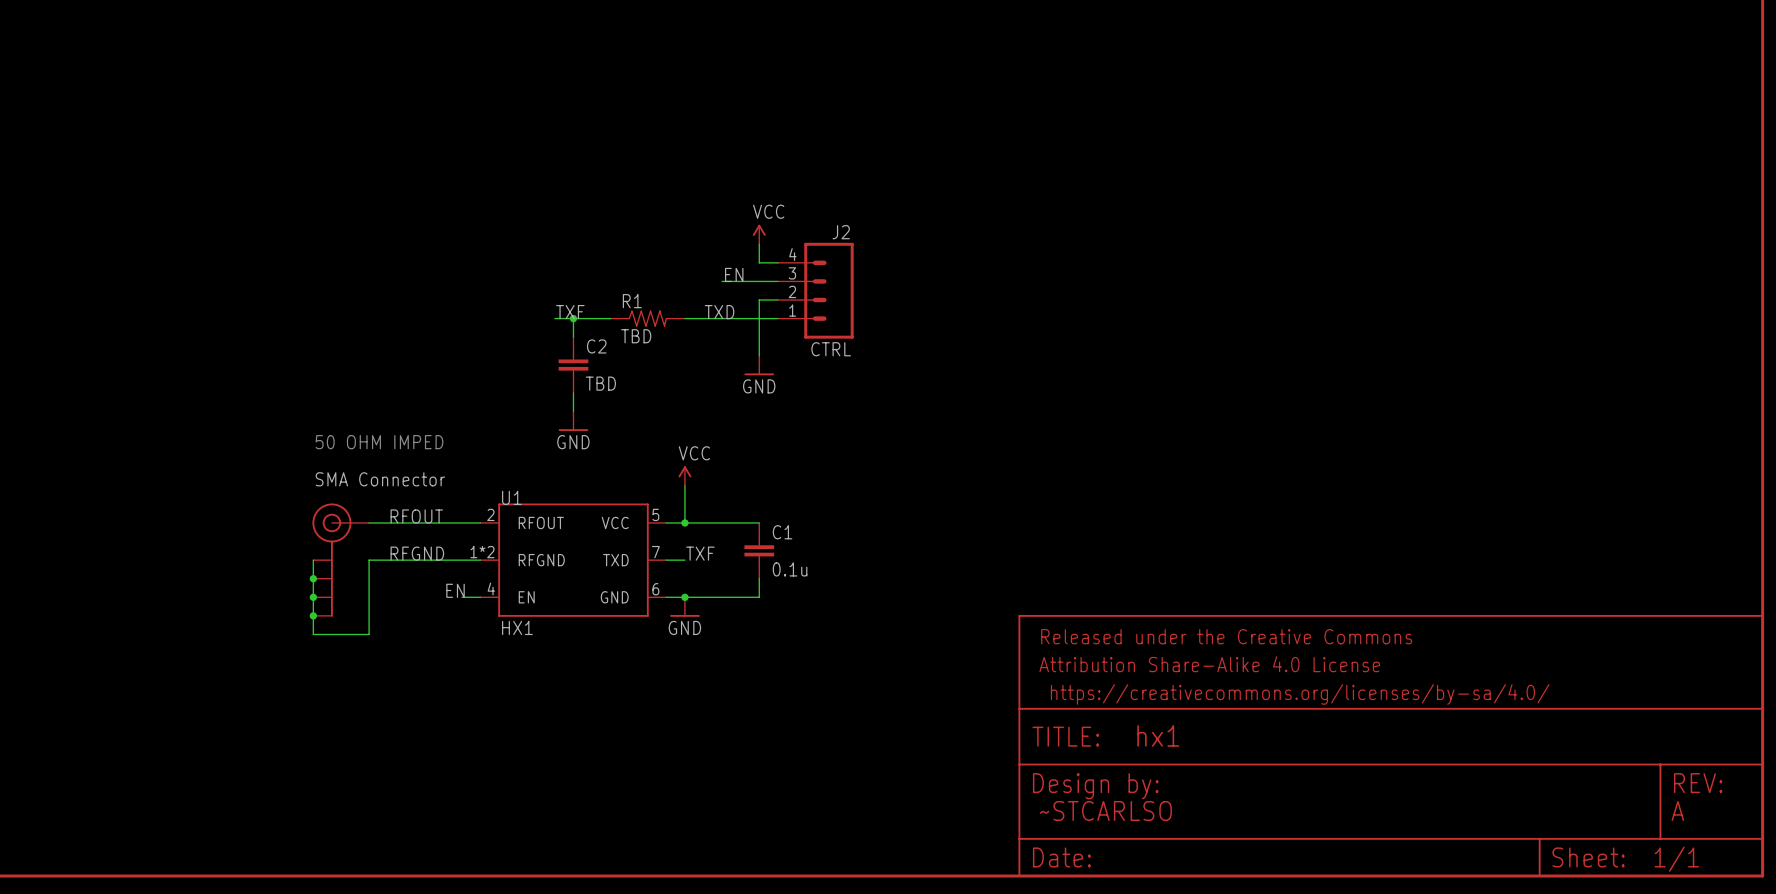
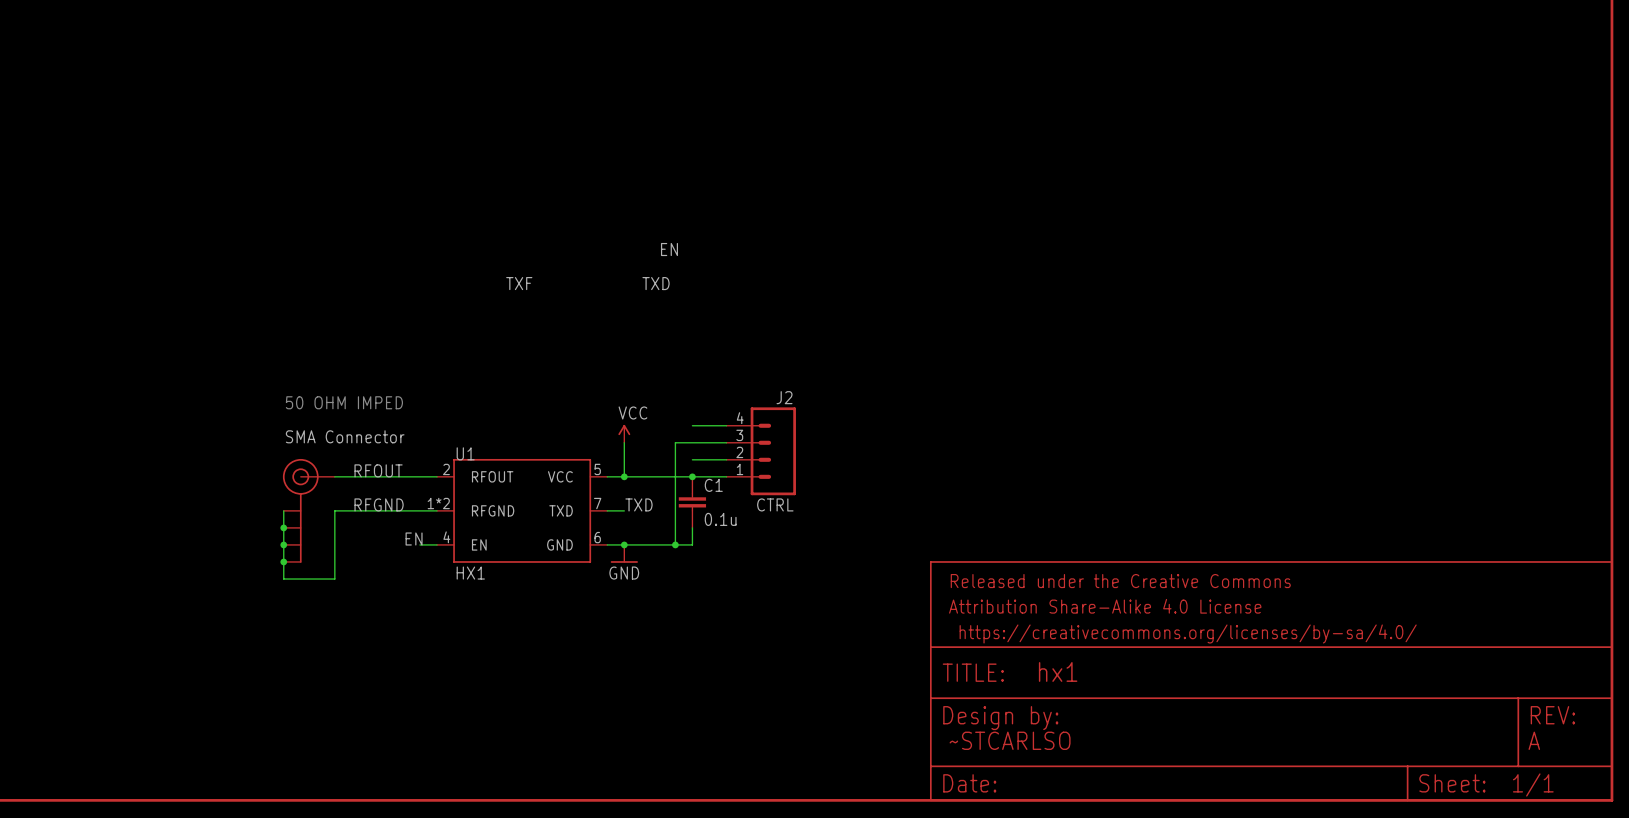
power symbol: VCC (759, 234) -> none
wire: (759, 244) (759, 262) (777, 262) -> none
wire: (722, 281) (777, 281) -> none
J2 position: (815, 290) -> (761, 451)
wire: (777, 300) (759, 300) (759, 355) -> none
wire: (554, 318) (610, 318) -> none
wire: (573, 318) (573, 337) -> none
junction: (573, 318) -> none
R1: TBD (647, 318) -> none
wire: (684, 318) (777, 318) -> none
C2: TBD (573, 365) -> none
power symbol: GND (759, 365) -> none
wire: (573, 392) (573, 411) -> none
power symbol: GND (573, 421) -> none
wire: none -> (692, 425) (726, 425)
wire: none -> (726, 442) (675, 442) (675, 544)
wire: none -> (692, 459) (726, 459)
wire: none -> (692, 476) (726, 476)
junction: none -> (692, 476)
label: TXF (700, 553) -> TXD (638, 504)
junction: none -> (675, 544)

